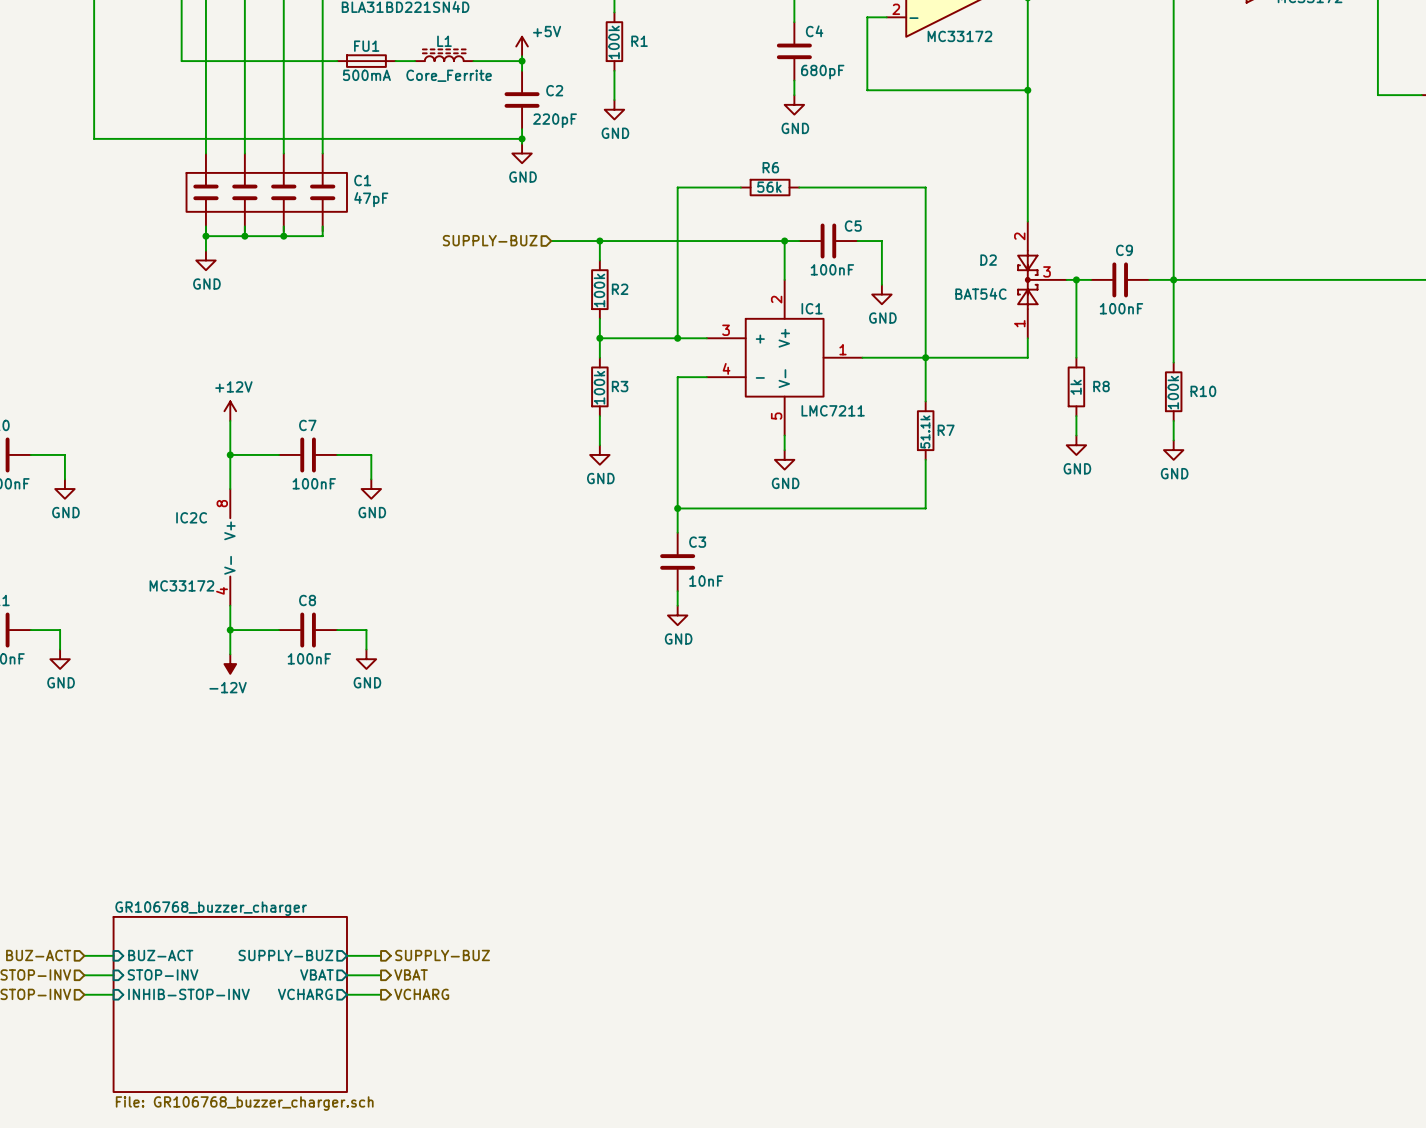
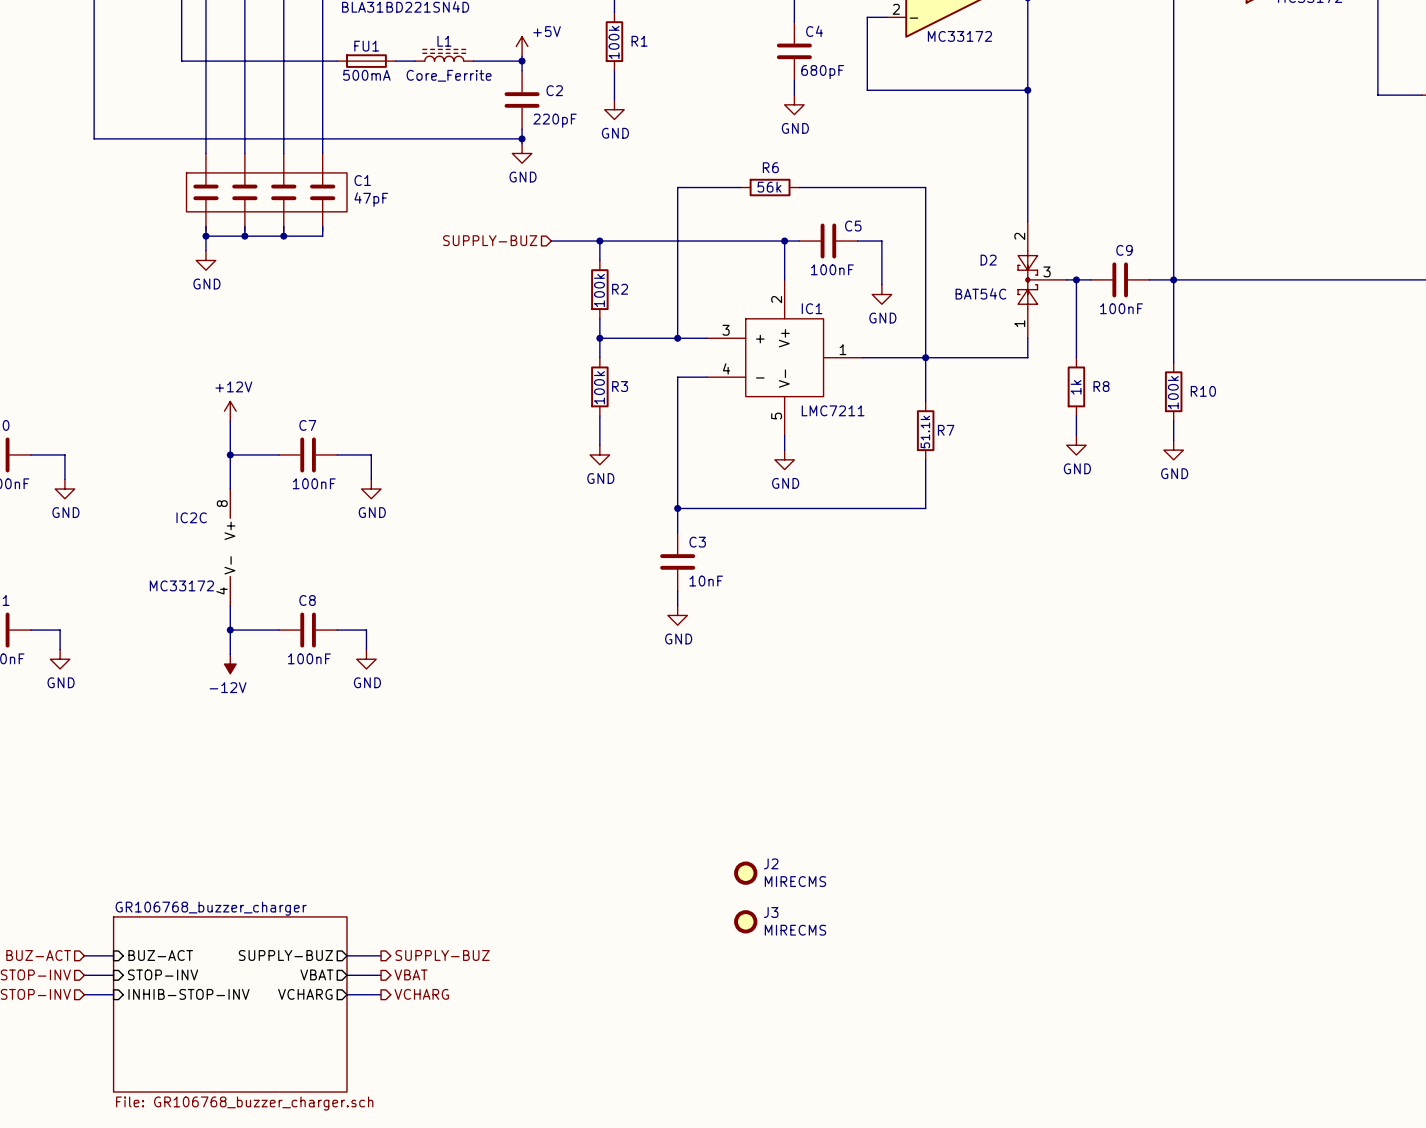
J2: none -> MIRECMS (745, 873)
J3: none -> MIRECMS (745, 921)

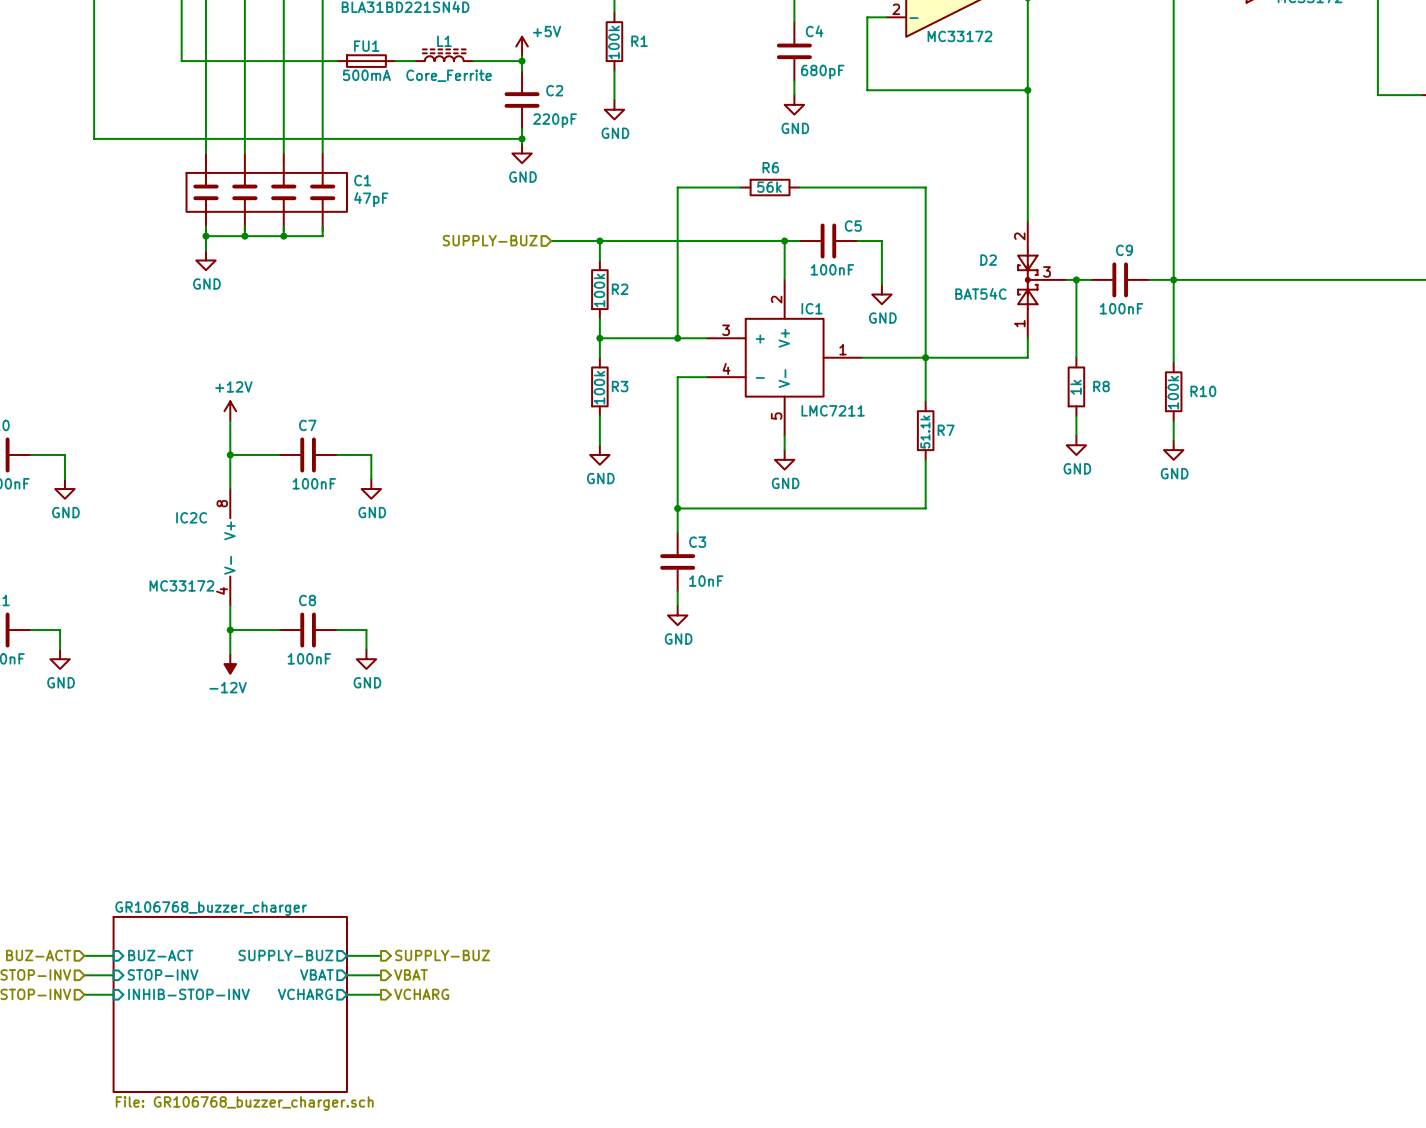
J2: MIRECMS (745, 873) -> none
J3: MIRECMS (745, 921) -> none

